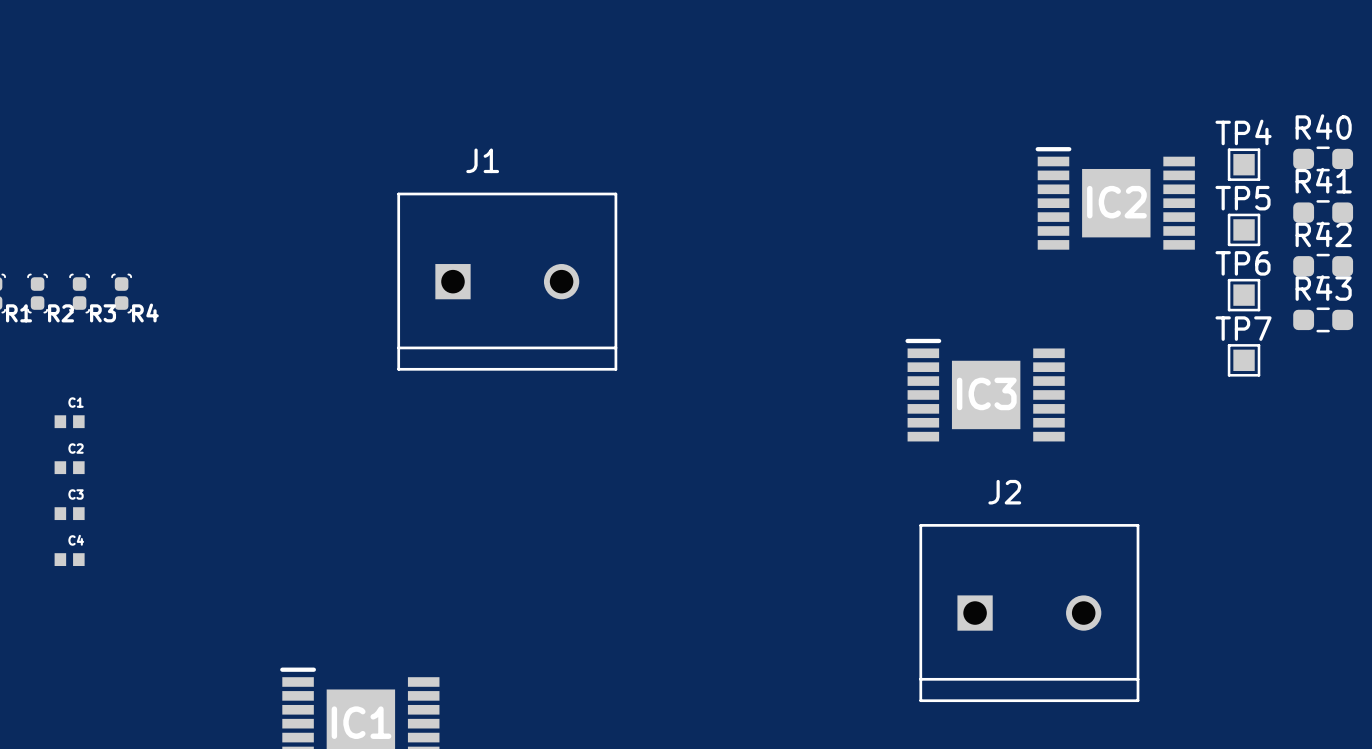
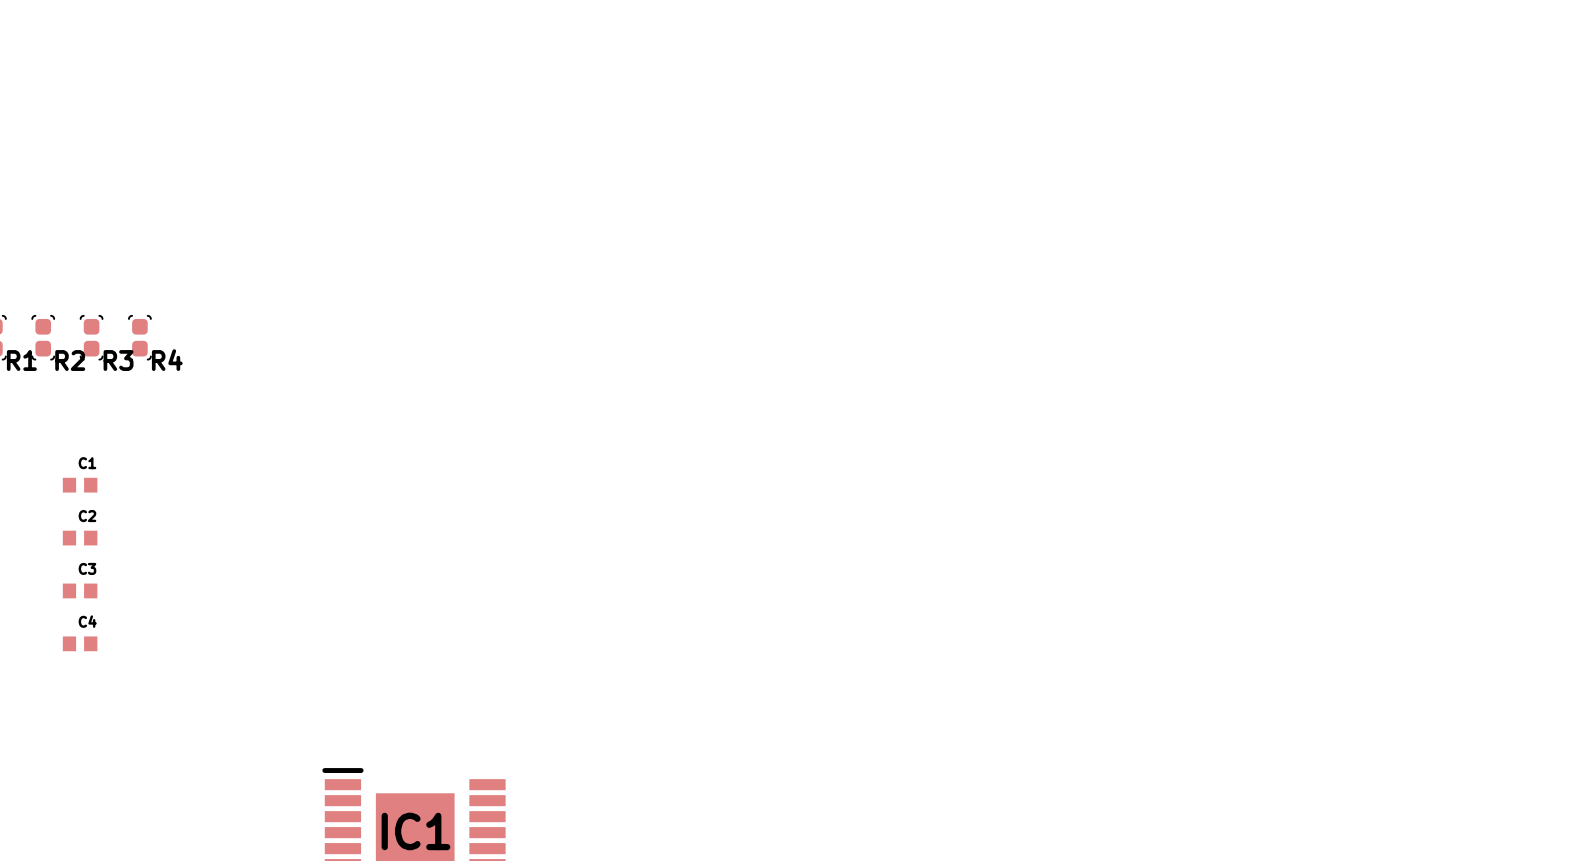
R40: (1323, 158) -> none
TP4: (1244, 164) -> none
part: (1115, 198) -> none
R41: (1323, 212) -> none
TP5: (1244, 229) -> none
R42: (1323, 266) -> none
J1: (507, 281) -> none
TP6: (1244, 295) -> none
R43: (1323, 319) -> none
TP7: (1244, 360) -> none
part: (985, 390) -> none
J2: (1029, 613) -> none

